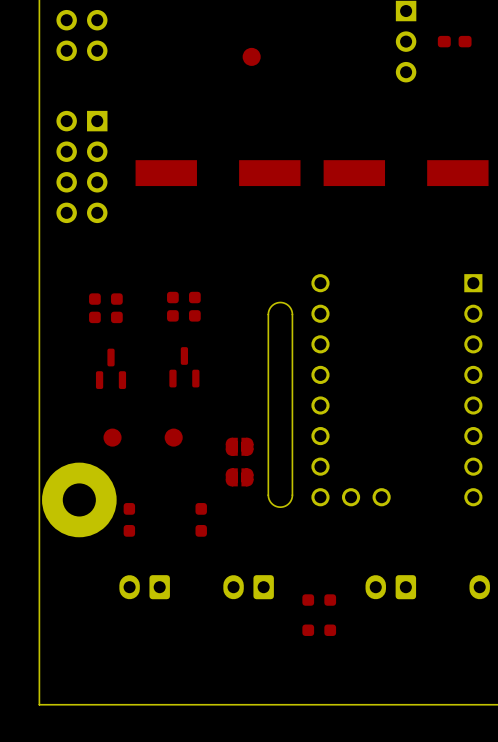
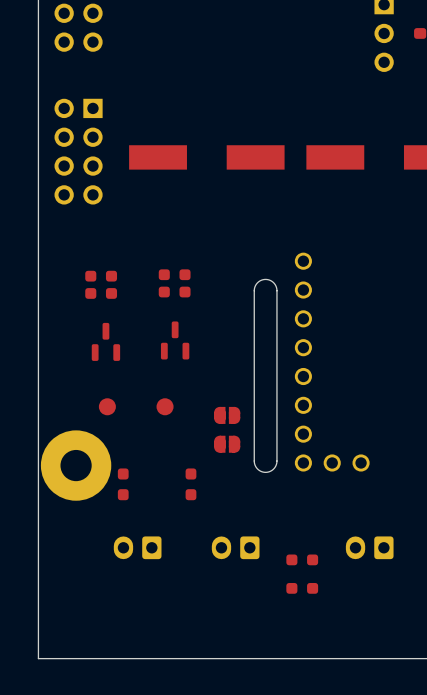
part: (251, 56) -> none

